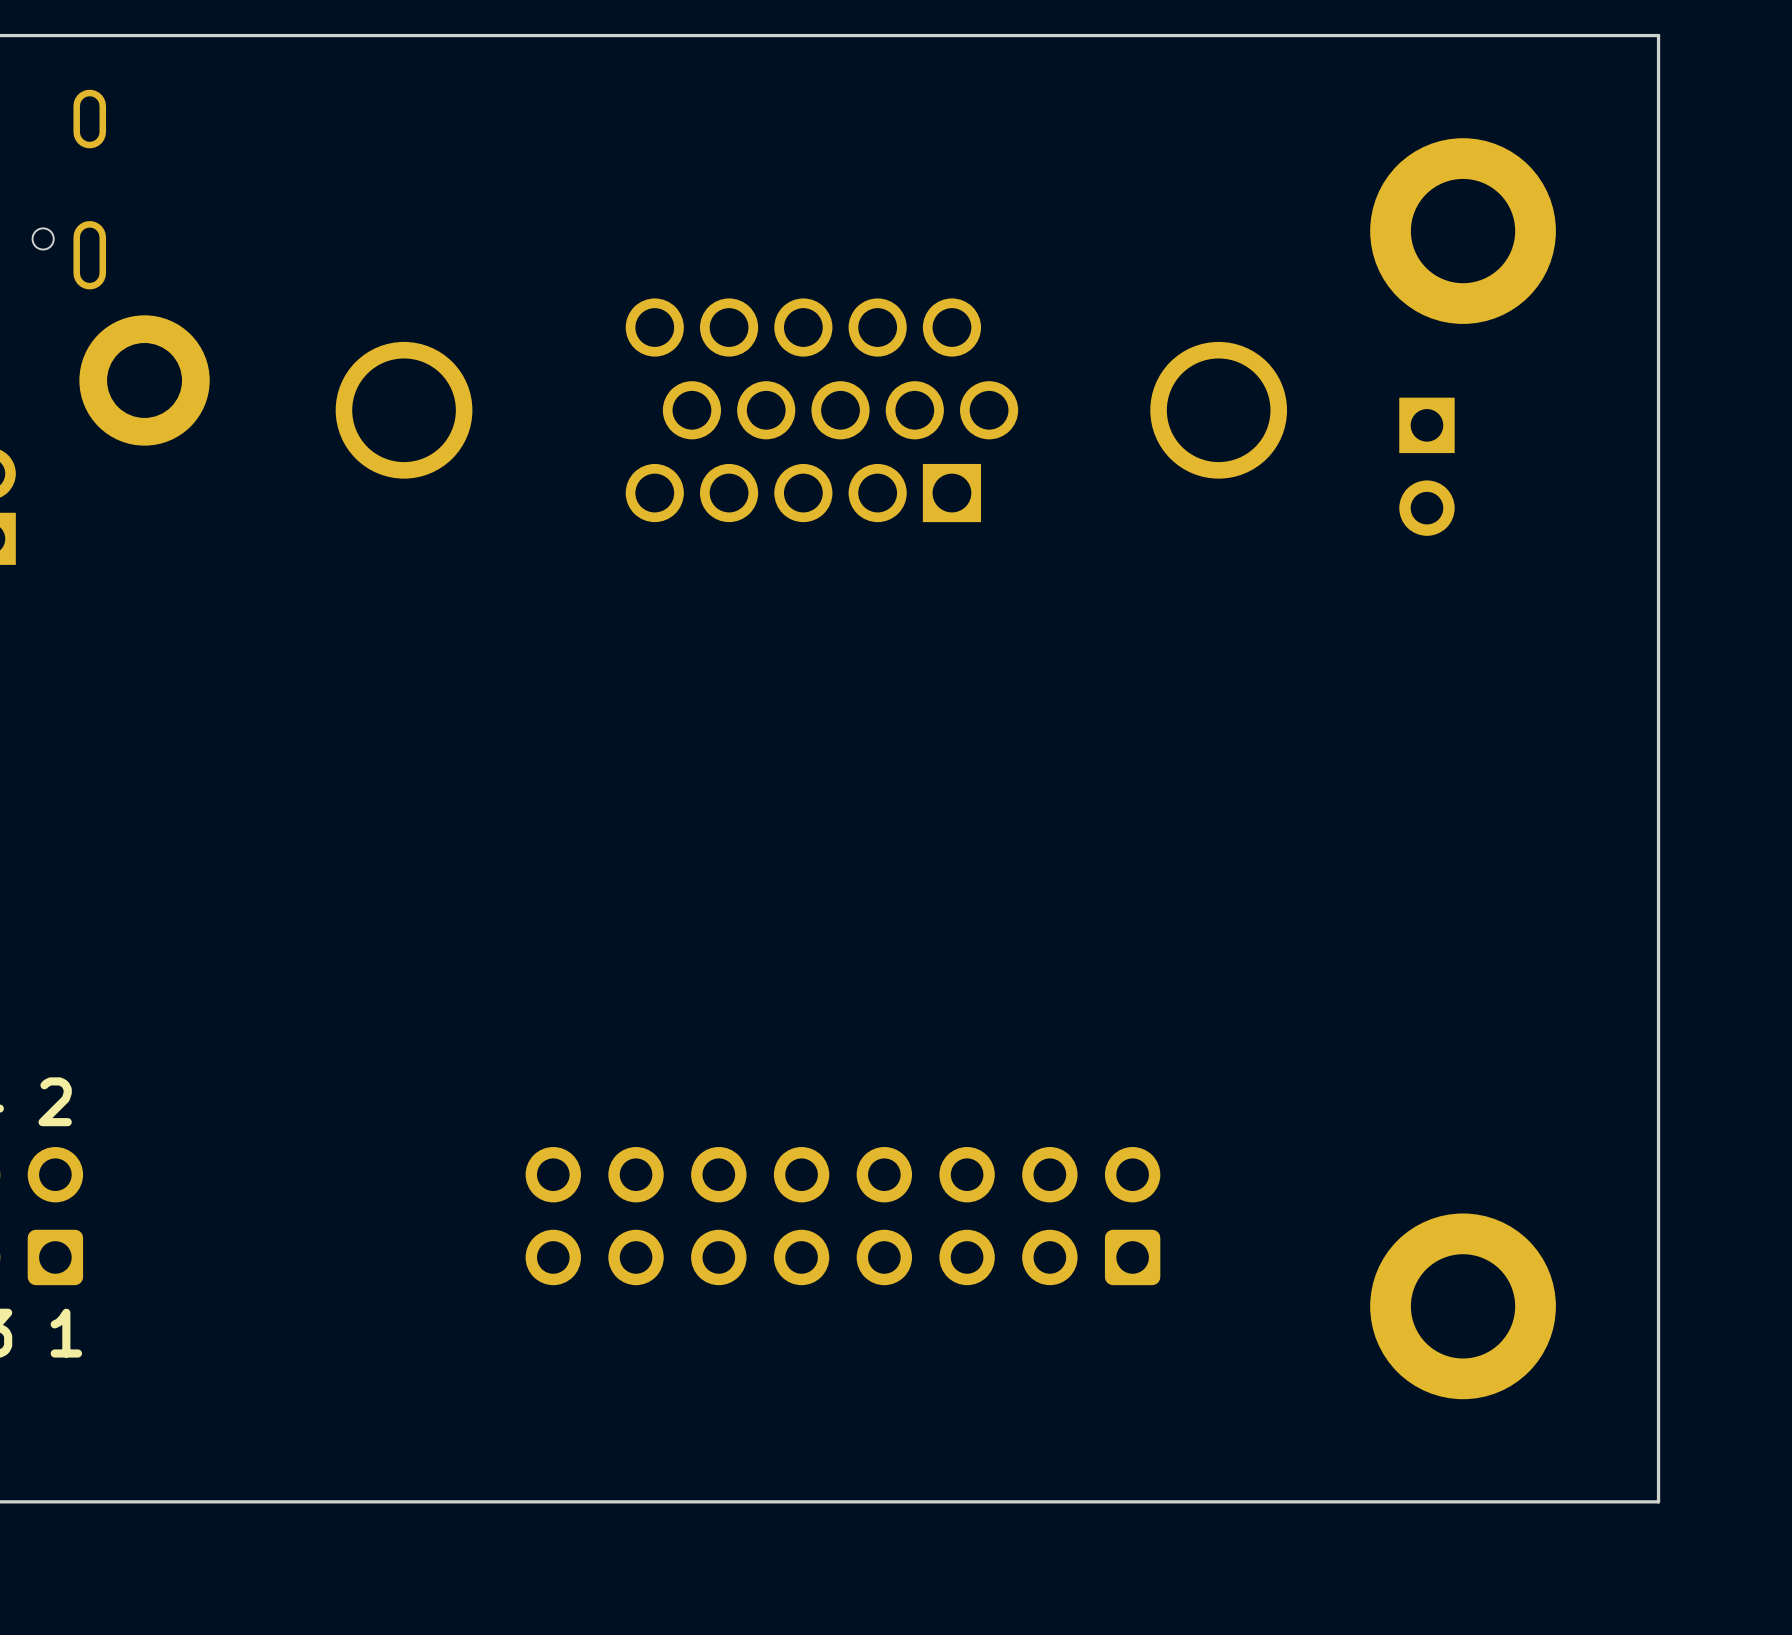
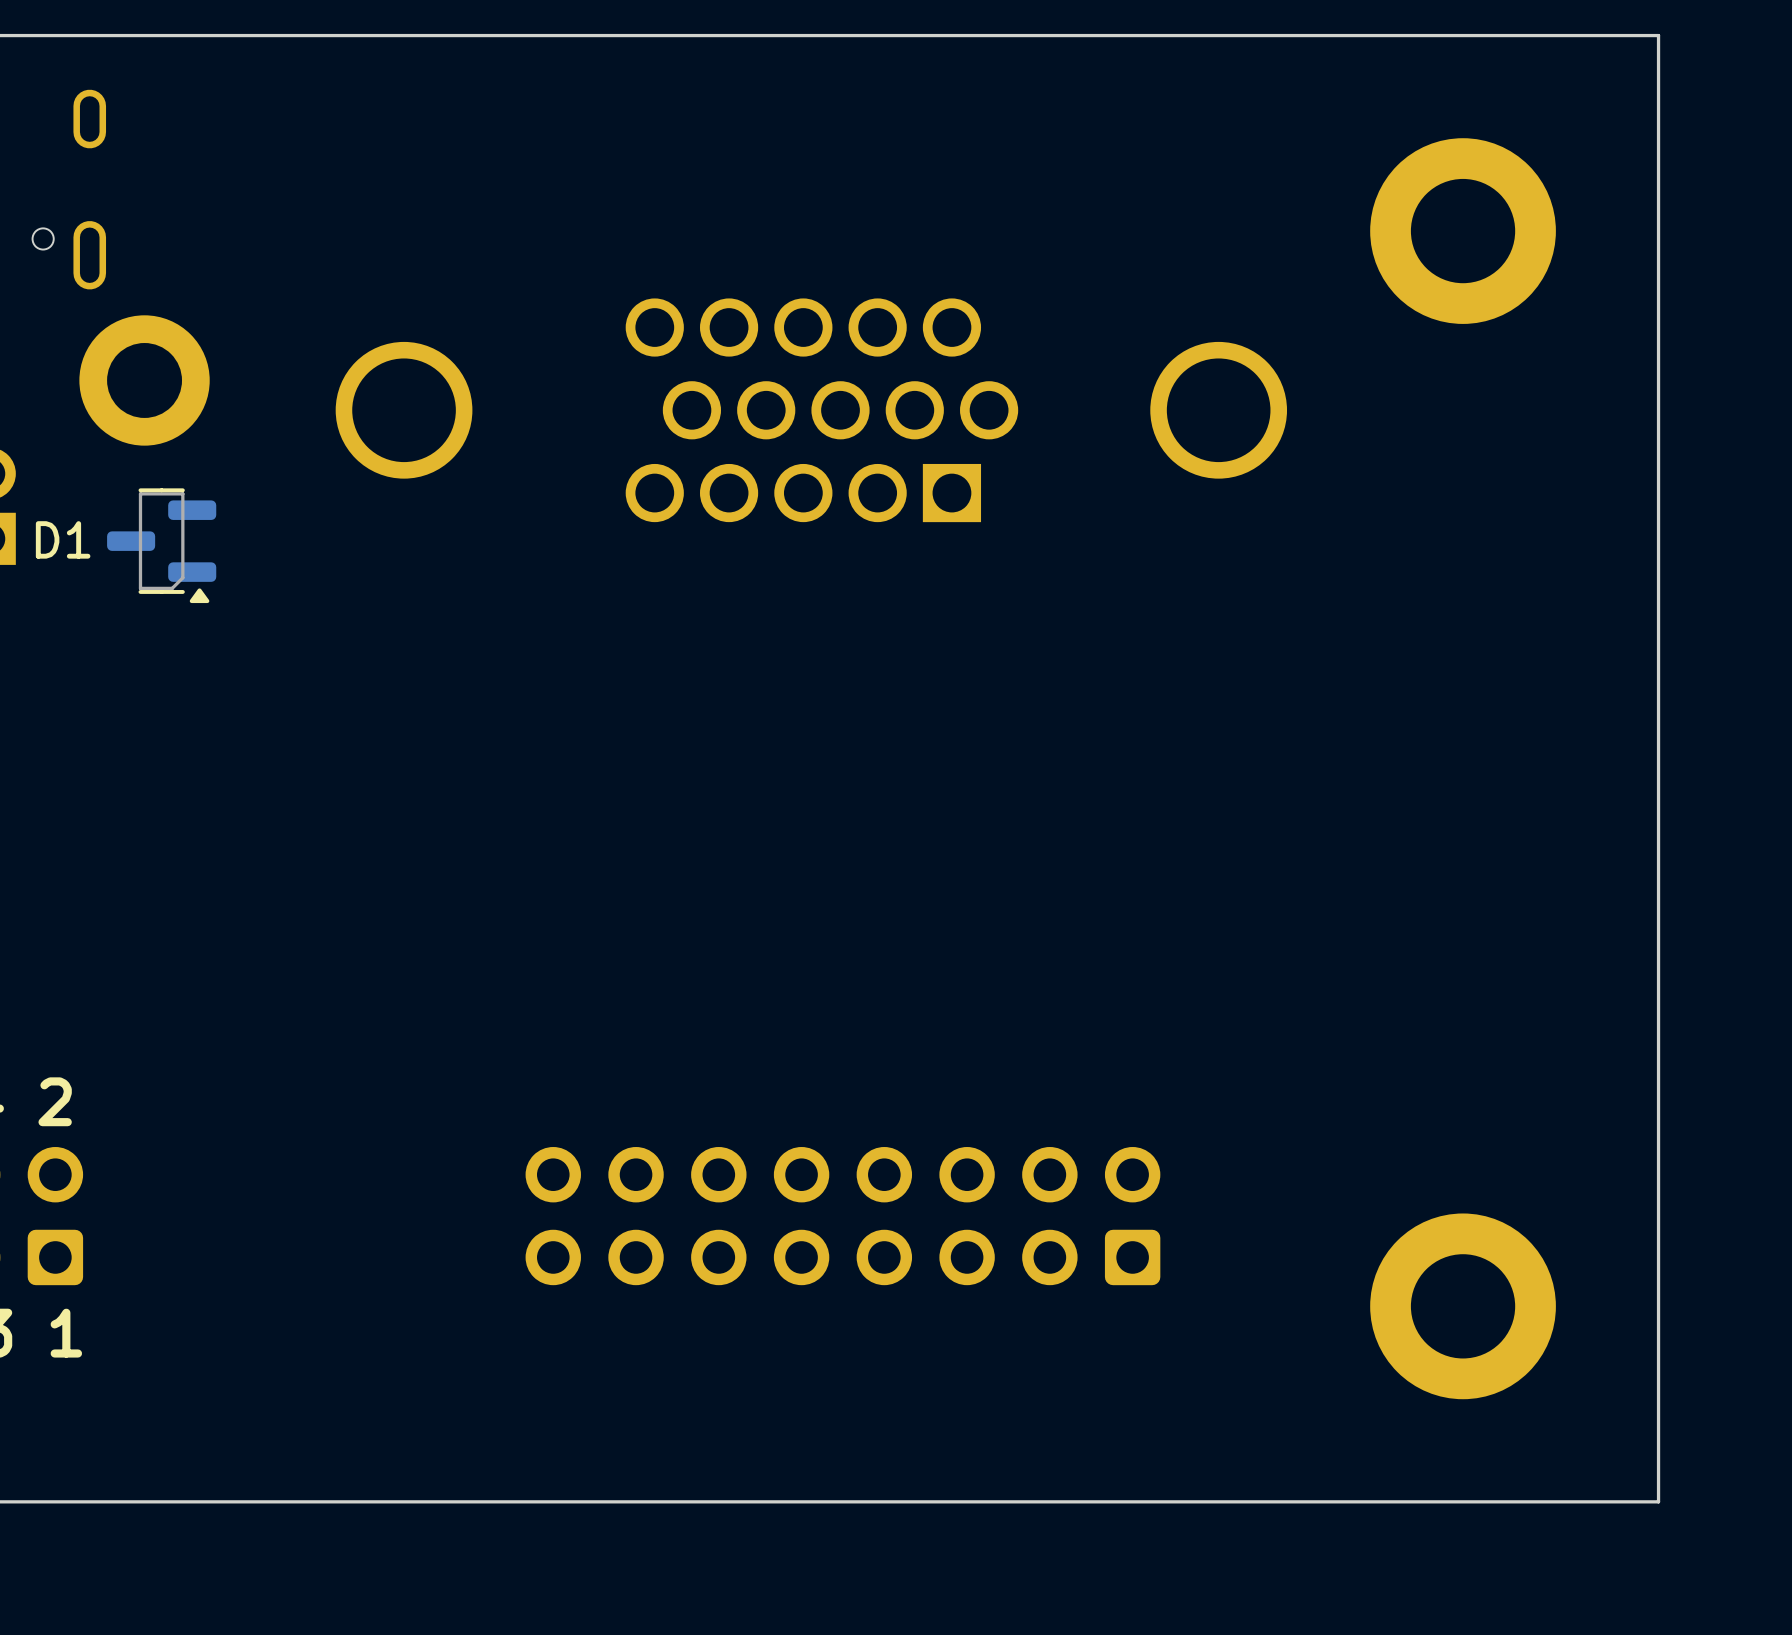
part: (1426, 466) -> none
D1: none -> (161, 545)

